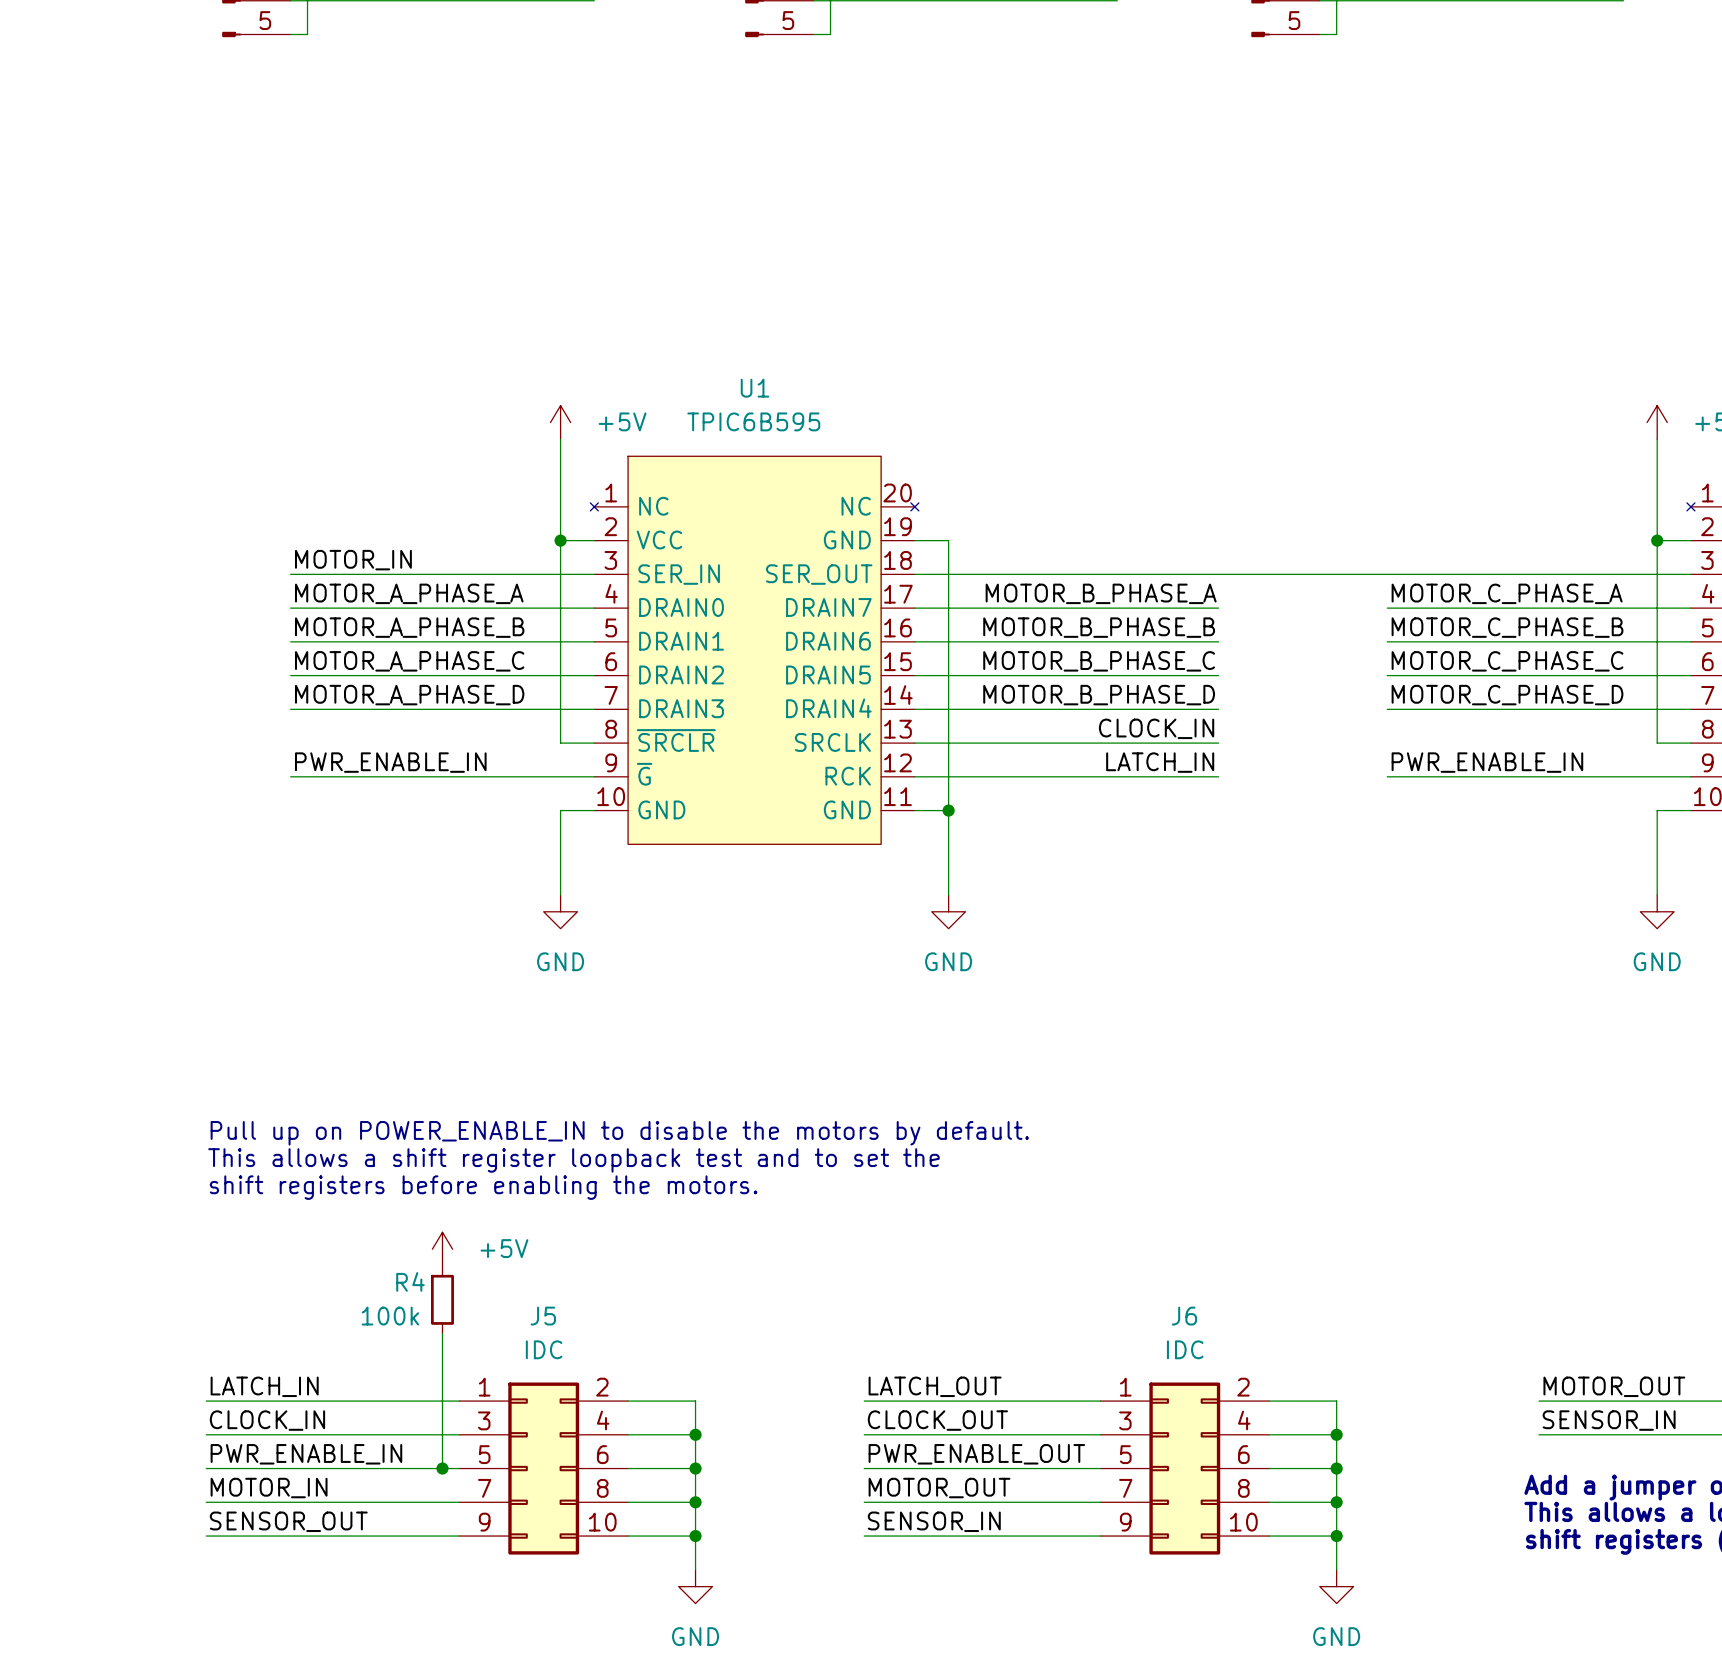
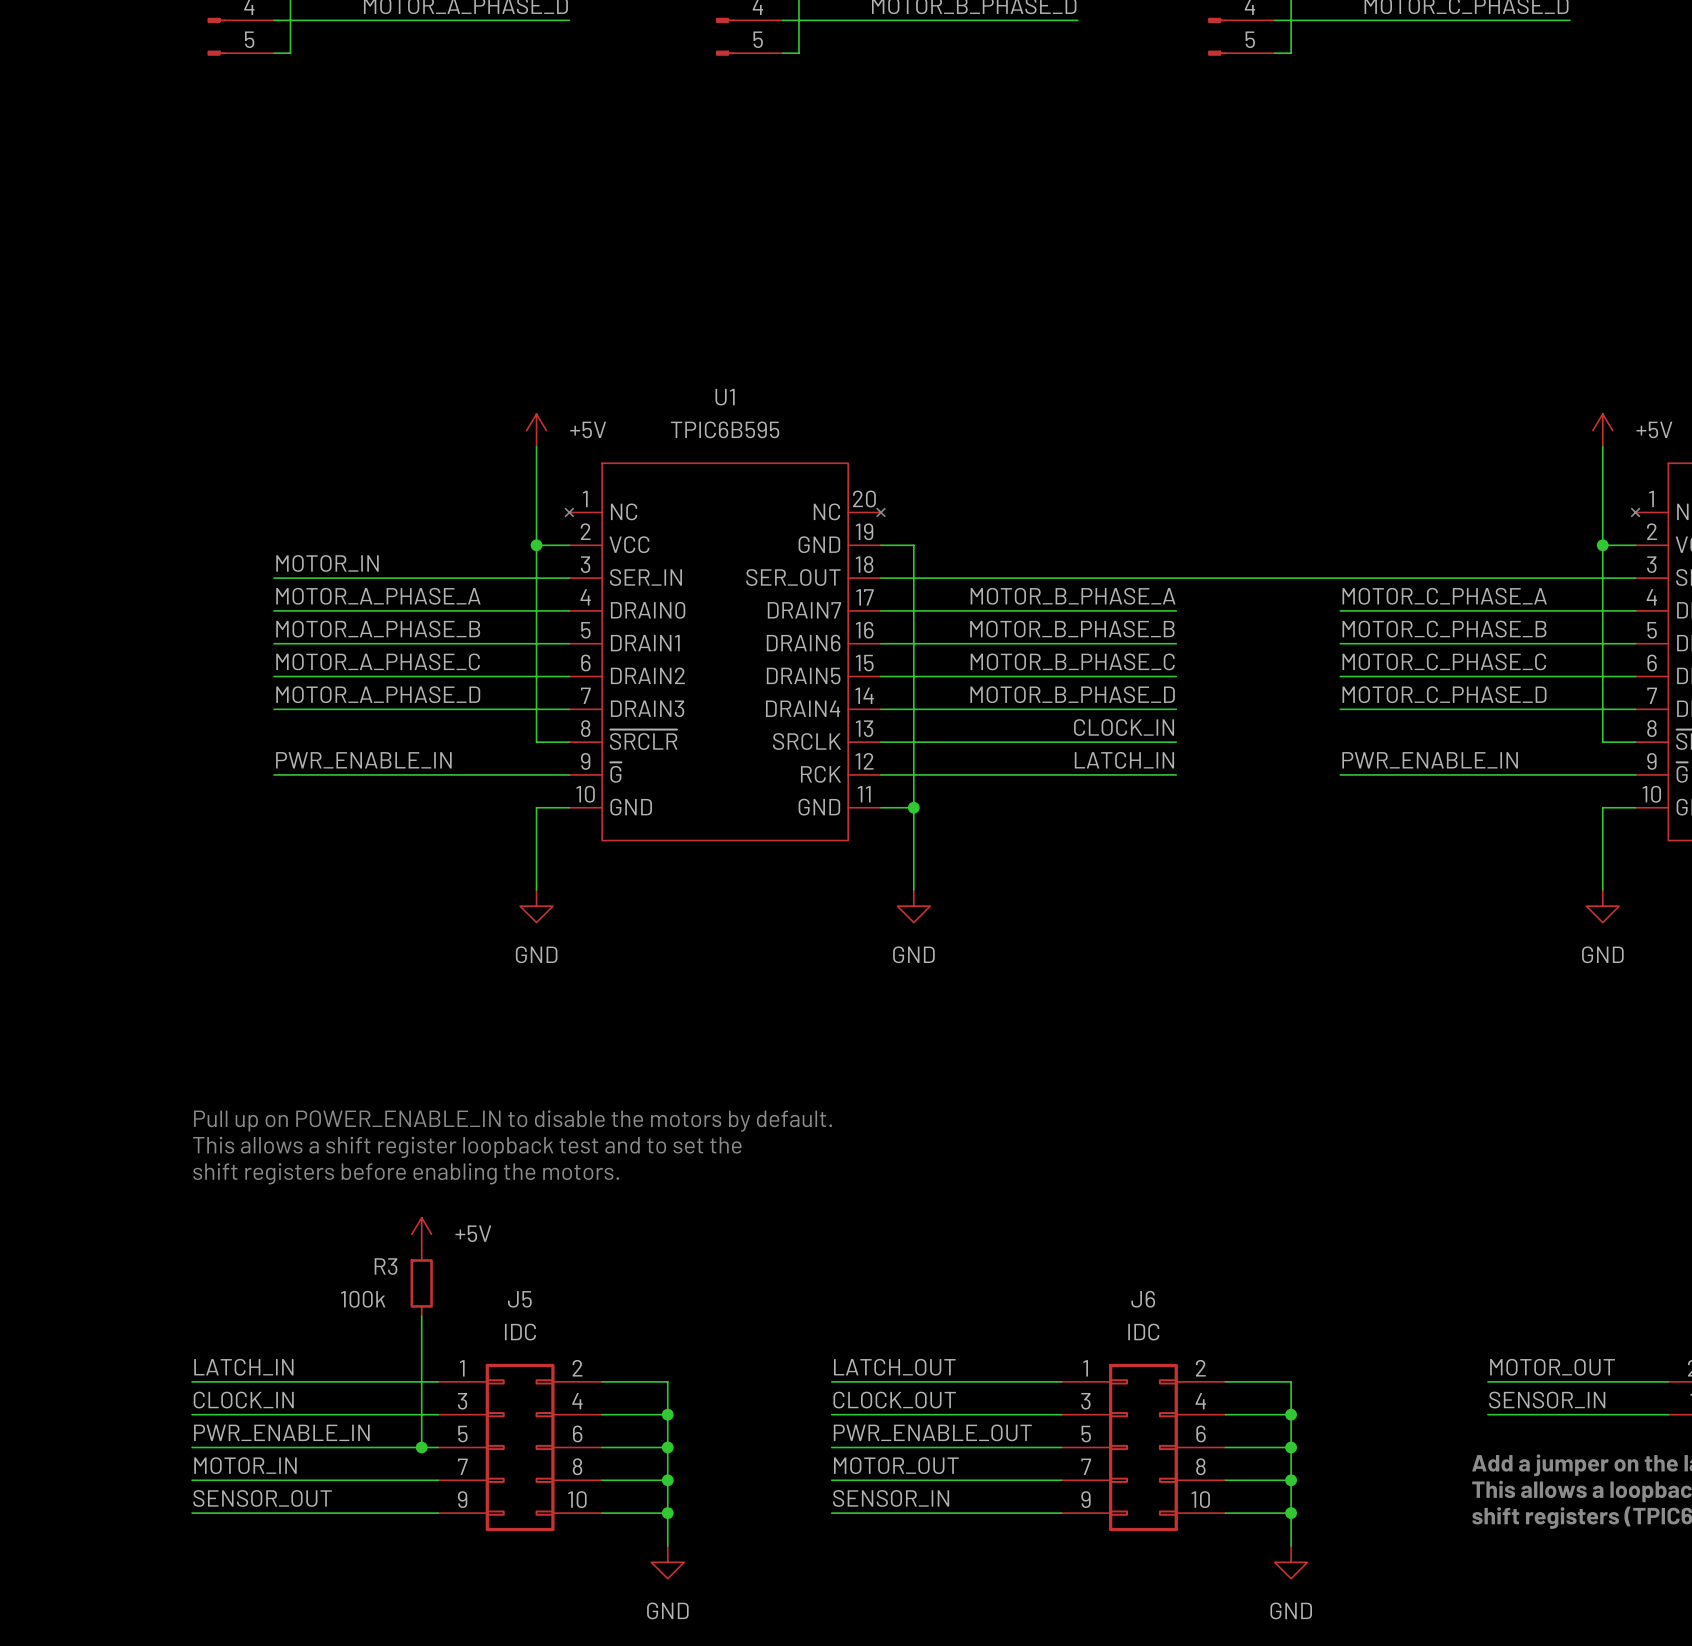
R4 name: R4 (410, 1281) -> R3 (386, 1266)

